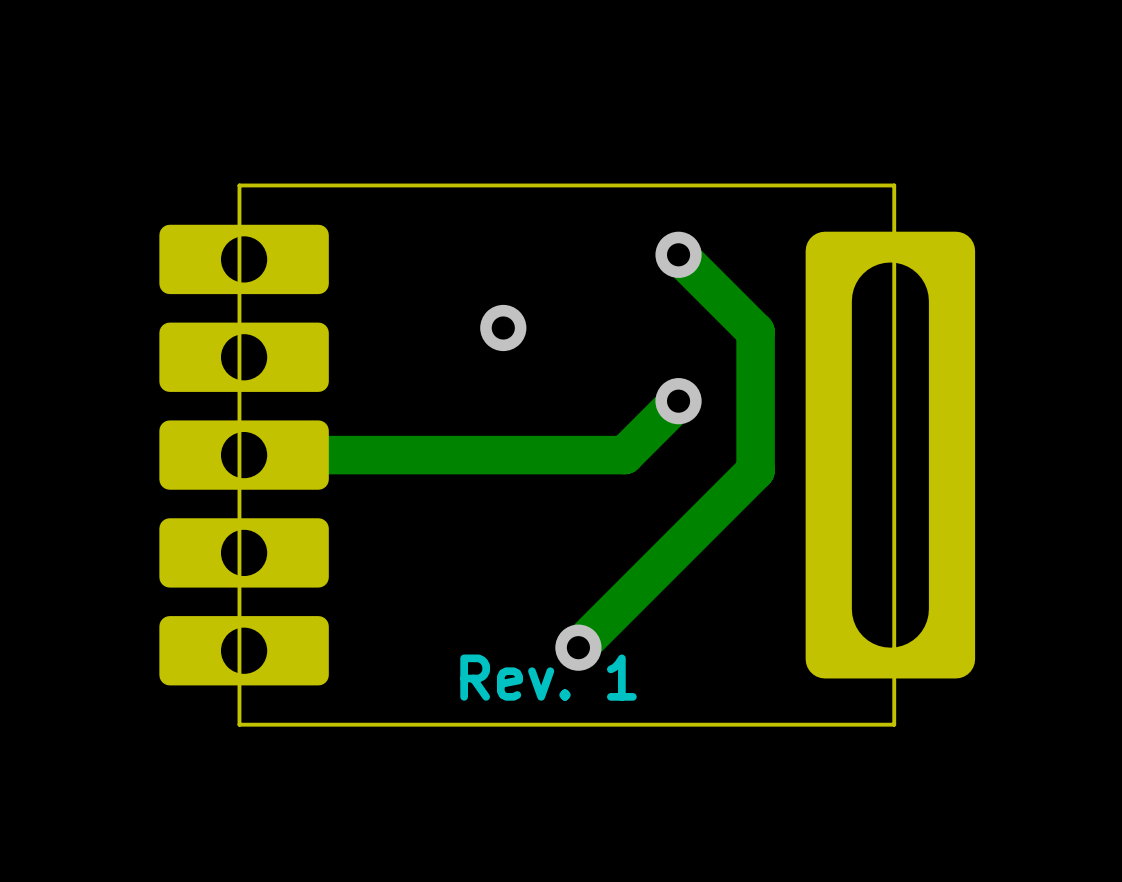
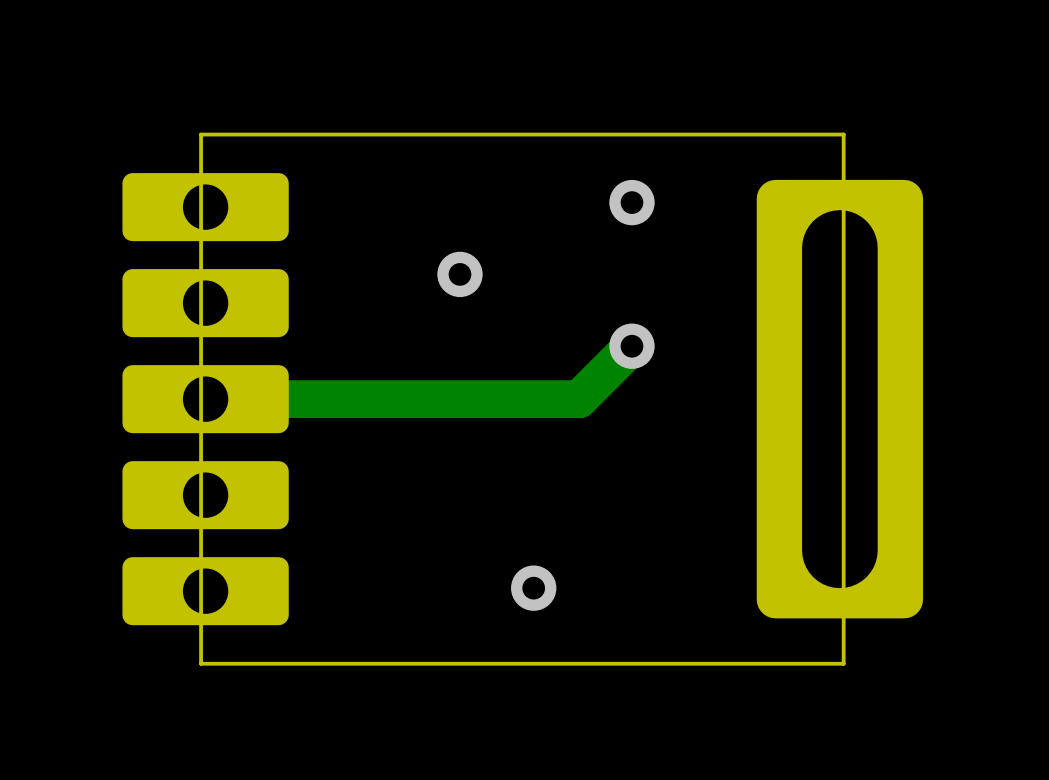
track: (678, 254) (755, 331) (755, 470) (578, 647) -> none
text: Rev. 1 (548, 677) -> none

